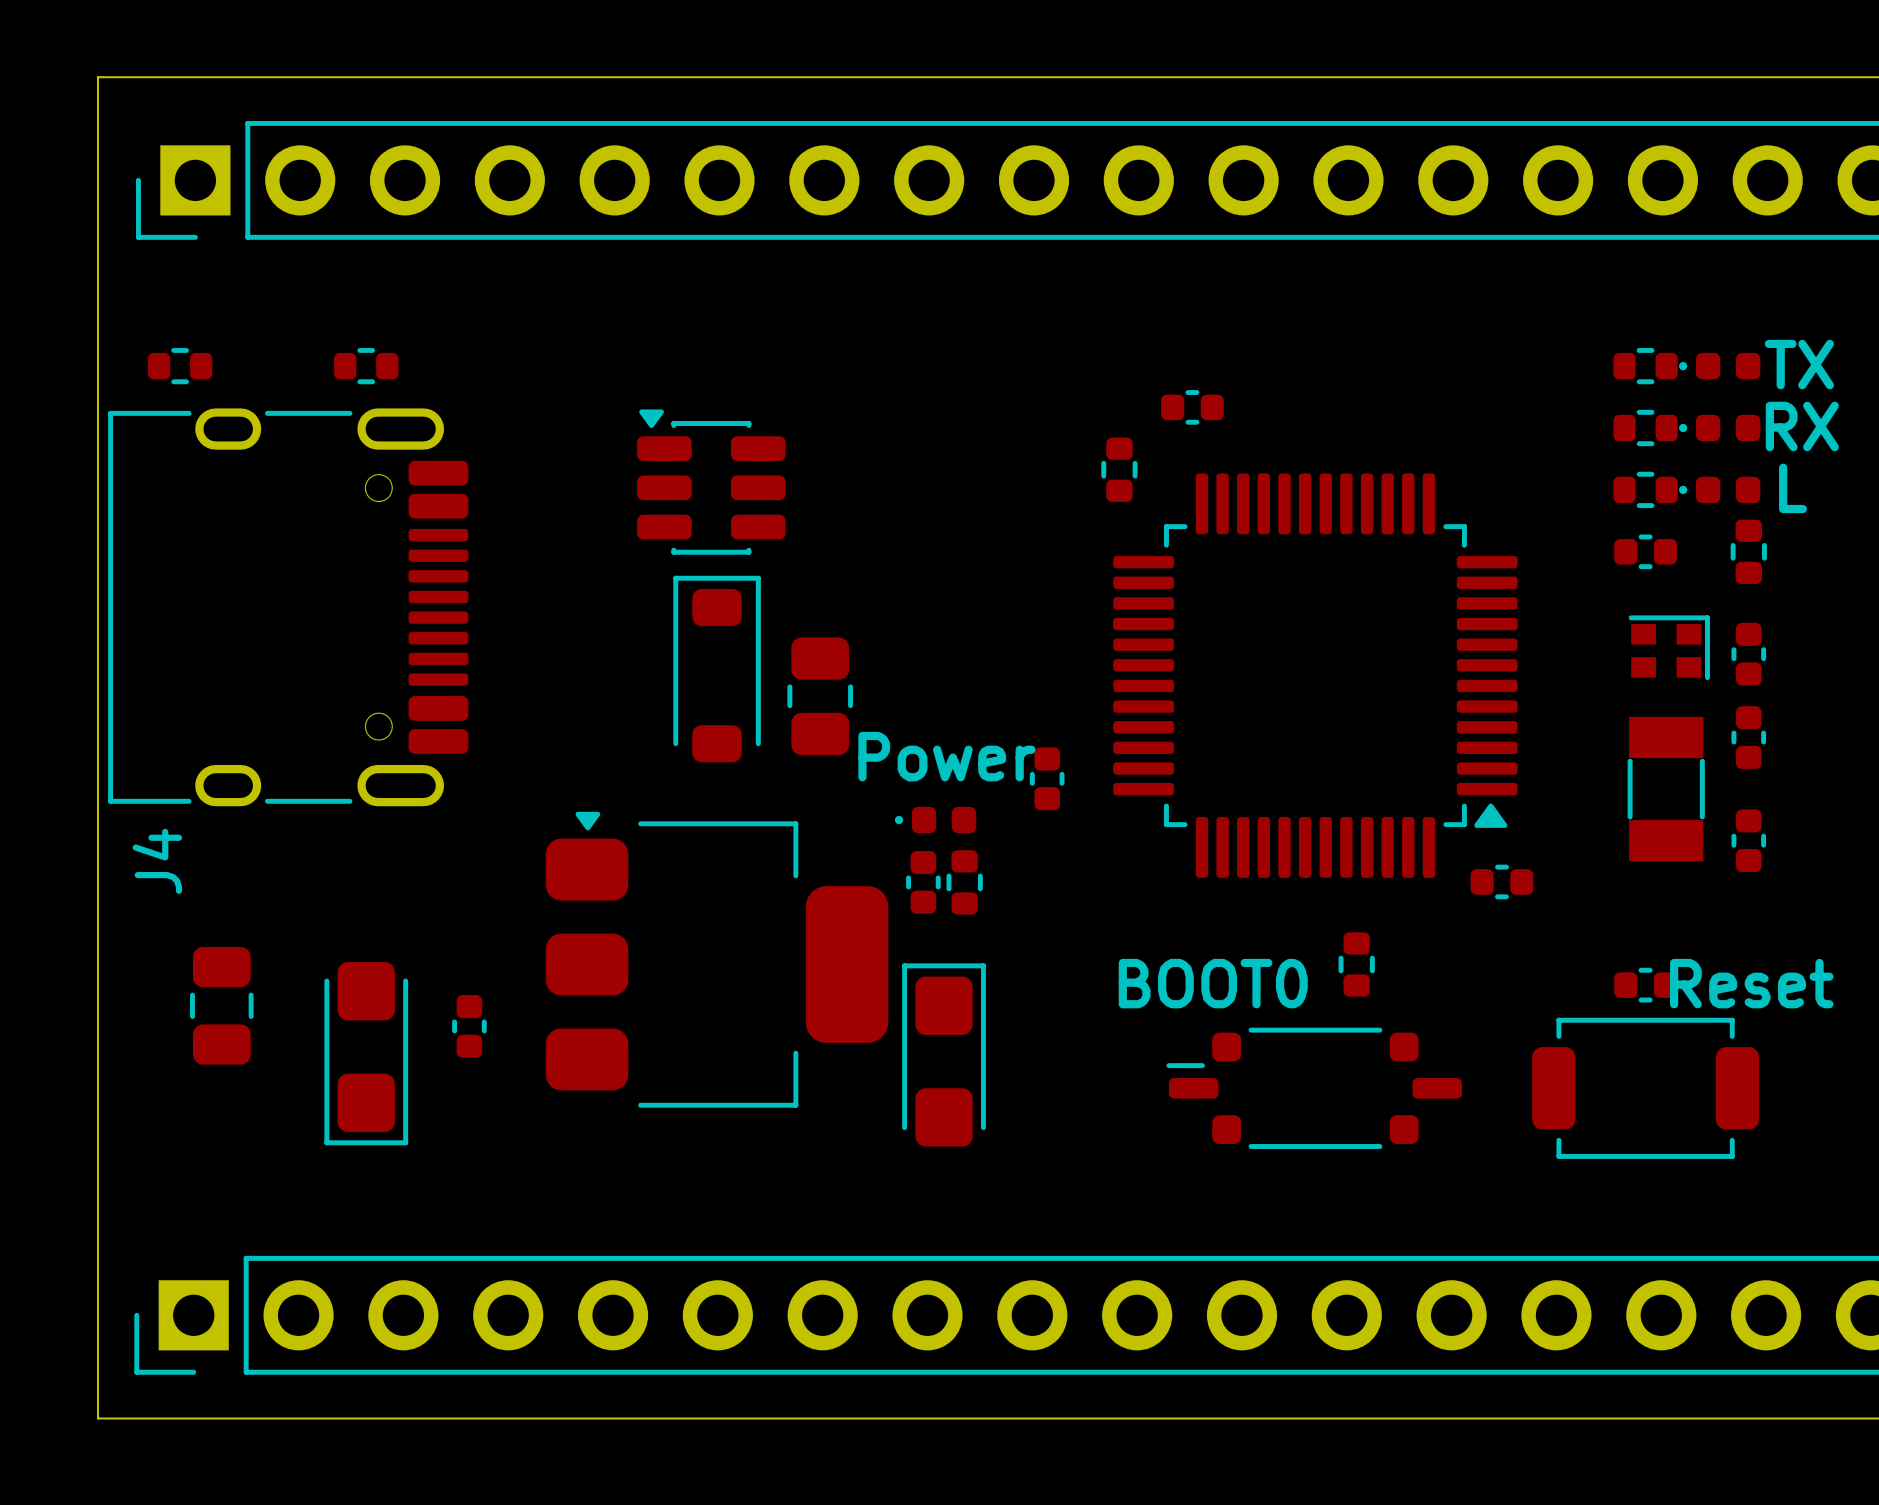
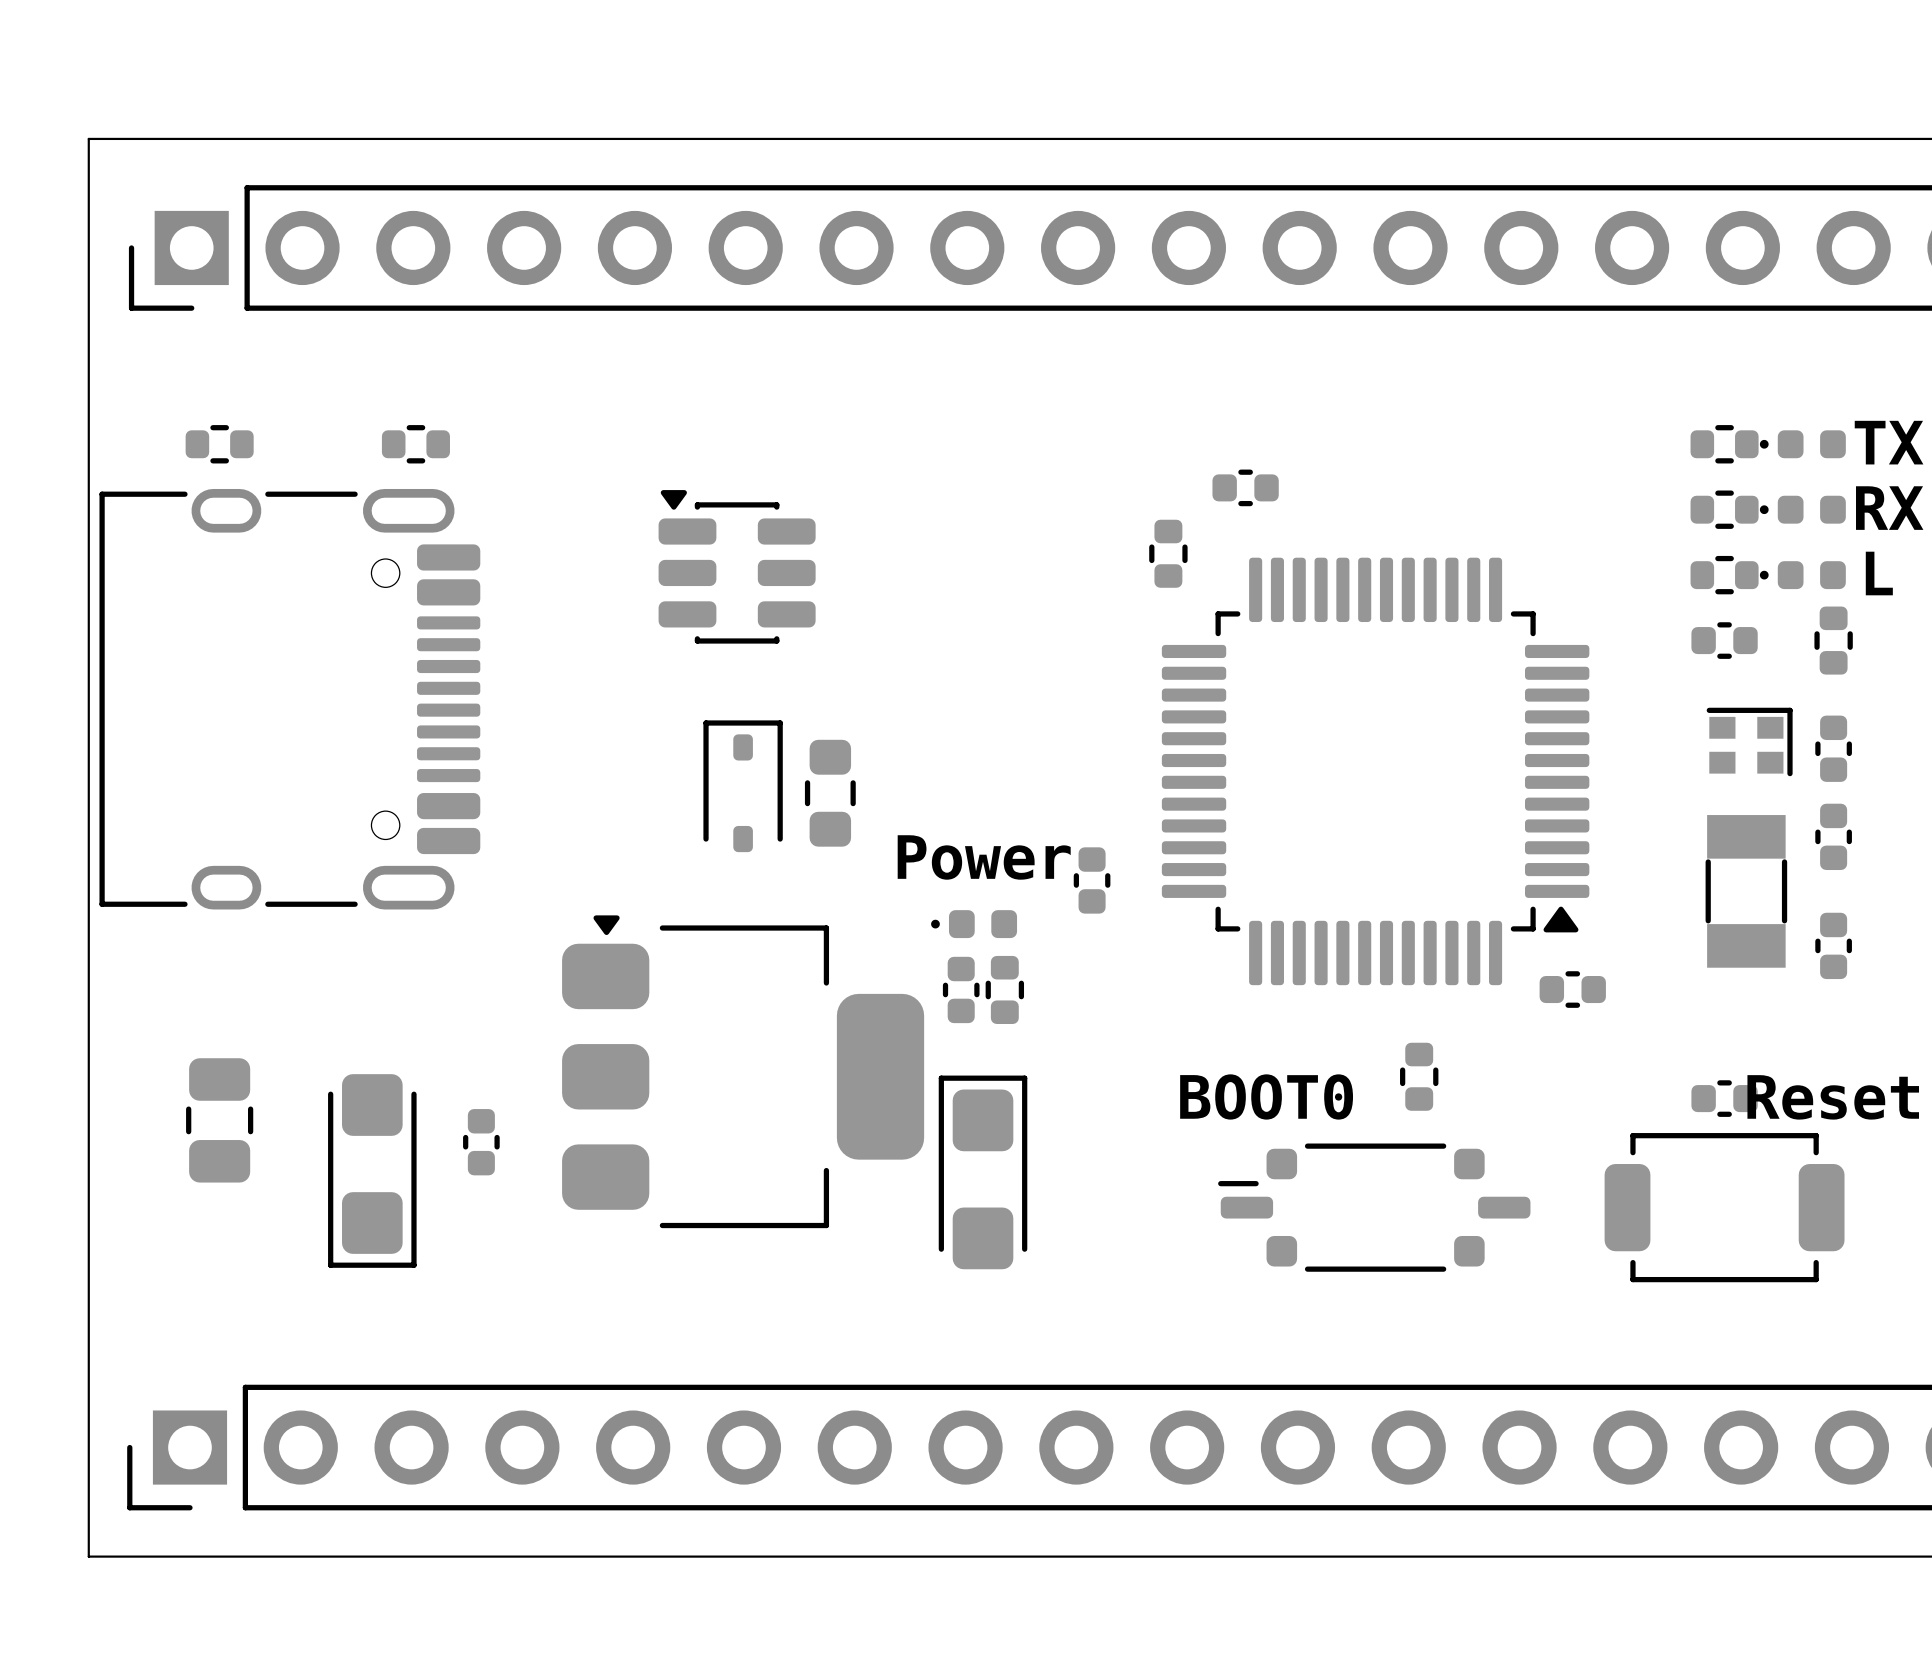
part position: (180, 366) -> (219, 444)
part position: (366, 366) -> (415, 444)
part footprint: [673, 575, 761, 763] -> [703, 720, 783, 853]
part footprint: [787, 637, 854, 756] -> [804, 739, 856, 847]
J4 name: J4 (157, 861) -> none

